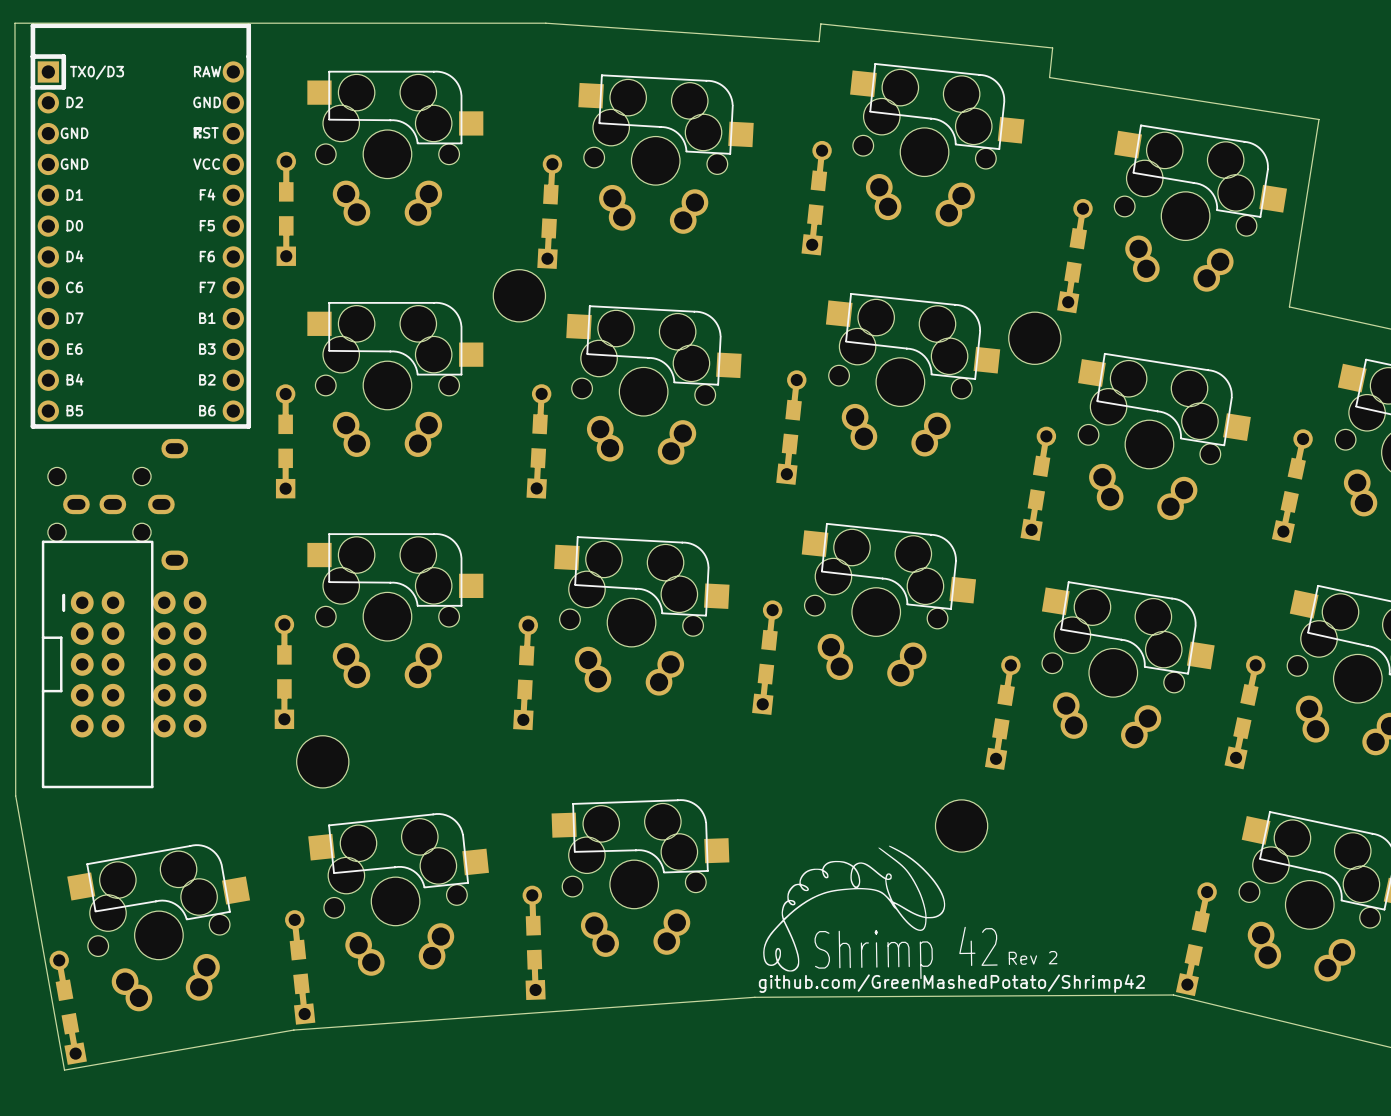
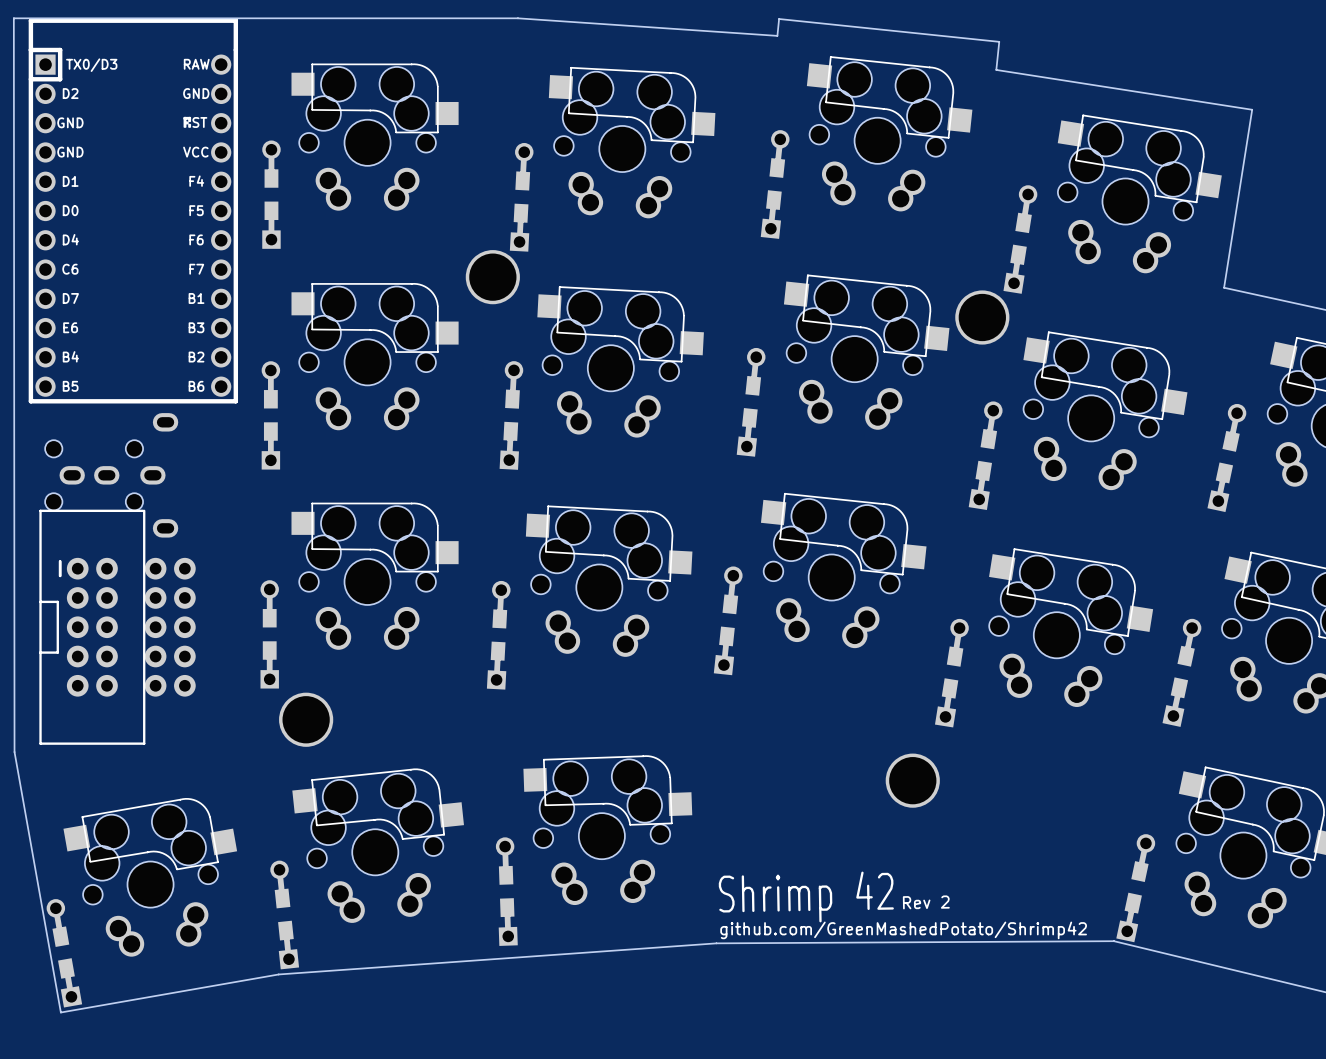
part footprint: [493, 269, 546, 322] -> [465, 250, 520, 305]
part footprint: [1008, 312, 1061, 365] -> [955, 290, 1010, 345]
part footprint: [296, 735, 349, 788] -> [279, 692, 334, 747]
part footprint: [935, 799, 988, 853] -> [885, 753, 940, 808]
drawing: [763, 845, 946, 972] -> none
text position: Shrimp 42 (906, 952) -> Shrimp 42 (806, 896)
text position: Rev 2 (1033, 958) -> Rev 2 (926, 902)

